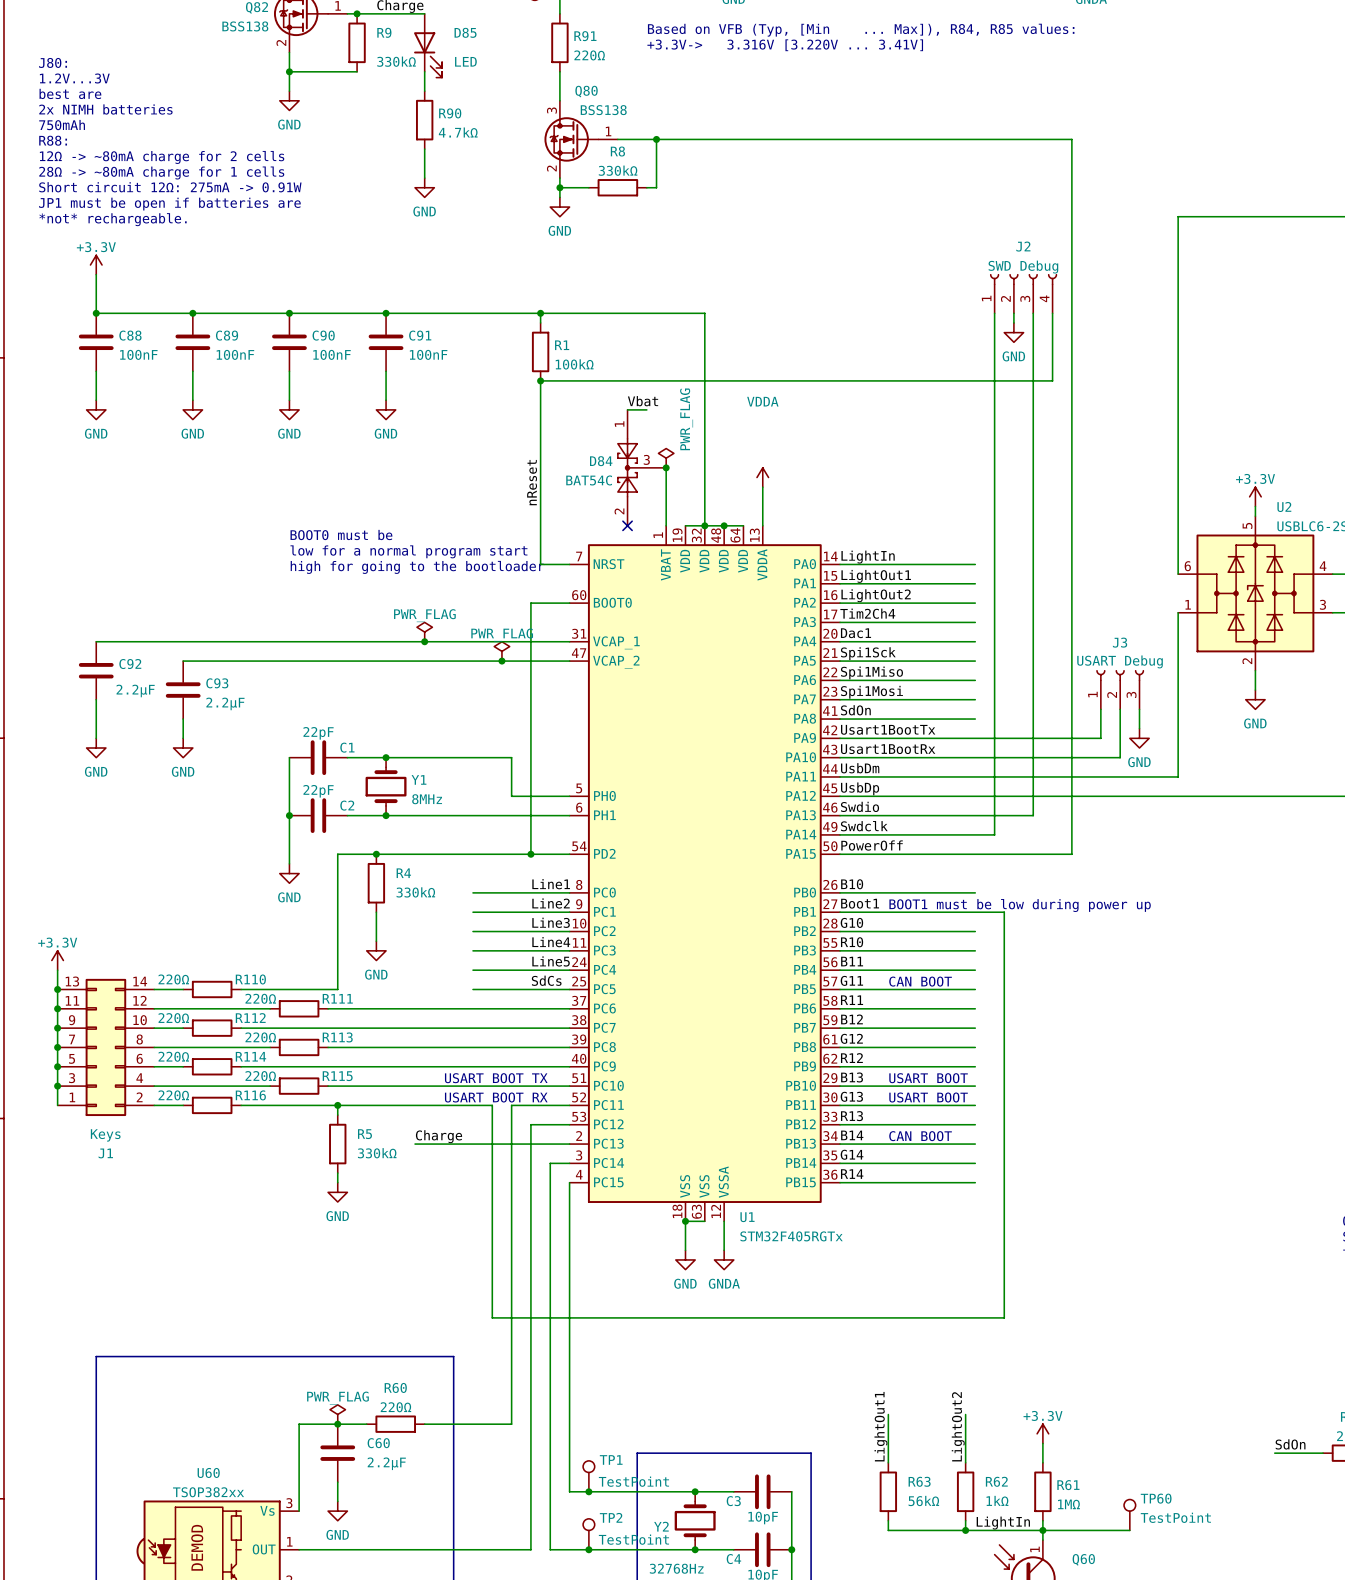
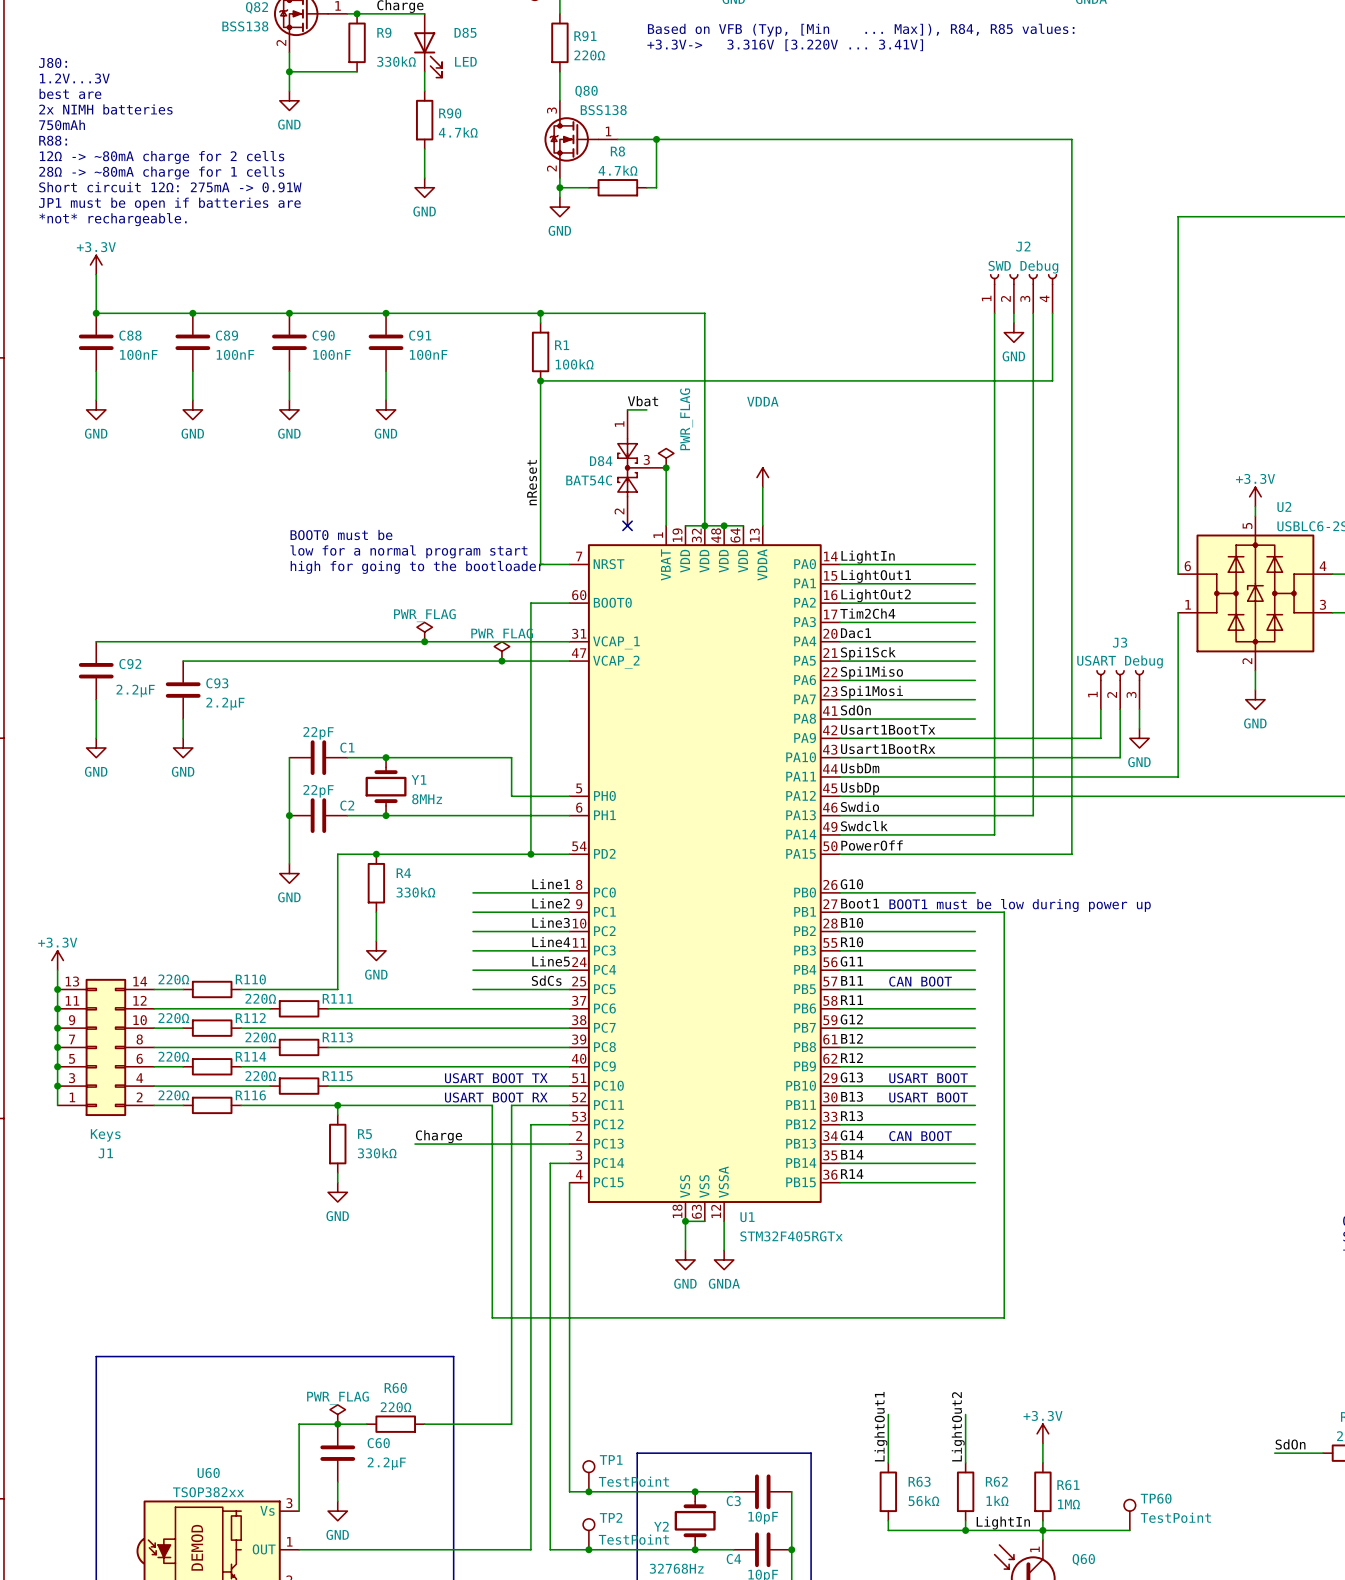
R8 value: 330kΩ (618, 170) -> 4.7kΩ (617, 170)
label: B10 (852, 884) -> G10 (851, 884)
label: G10 (851, 922) -> B10 (852, 922)
label: B11 (852, 961) -> G11 (851, 961)
label: G11 (851, 980) -> B11 (852, 980)
label: B12 (851, 1019) -> G12 (851, 1019)
label: G12 (851, 1038) -> B12 (851, 1038)
label: B13 (852, 1077) -> G13 (851, 1077)
label: G13 (851, 1096) -> B13 (852, 1096)
label: B14 (852, 1135) -> G14 (852, 1135)
label: G14 (852, 1154) -> B14 (852, 1154)

